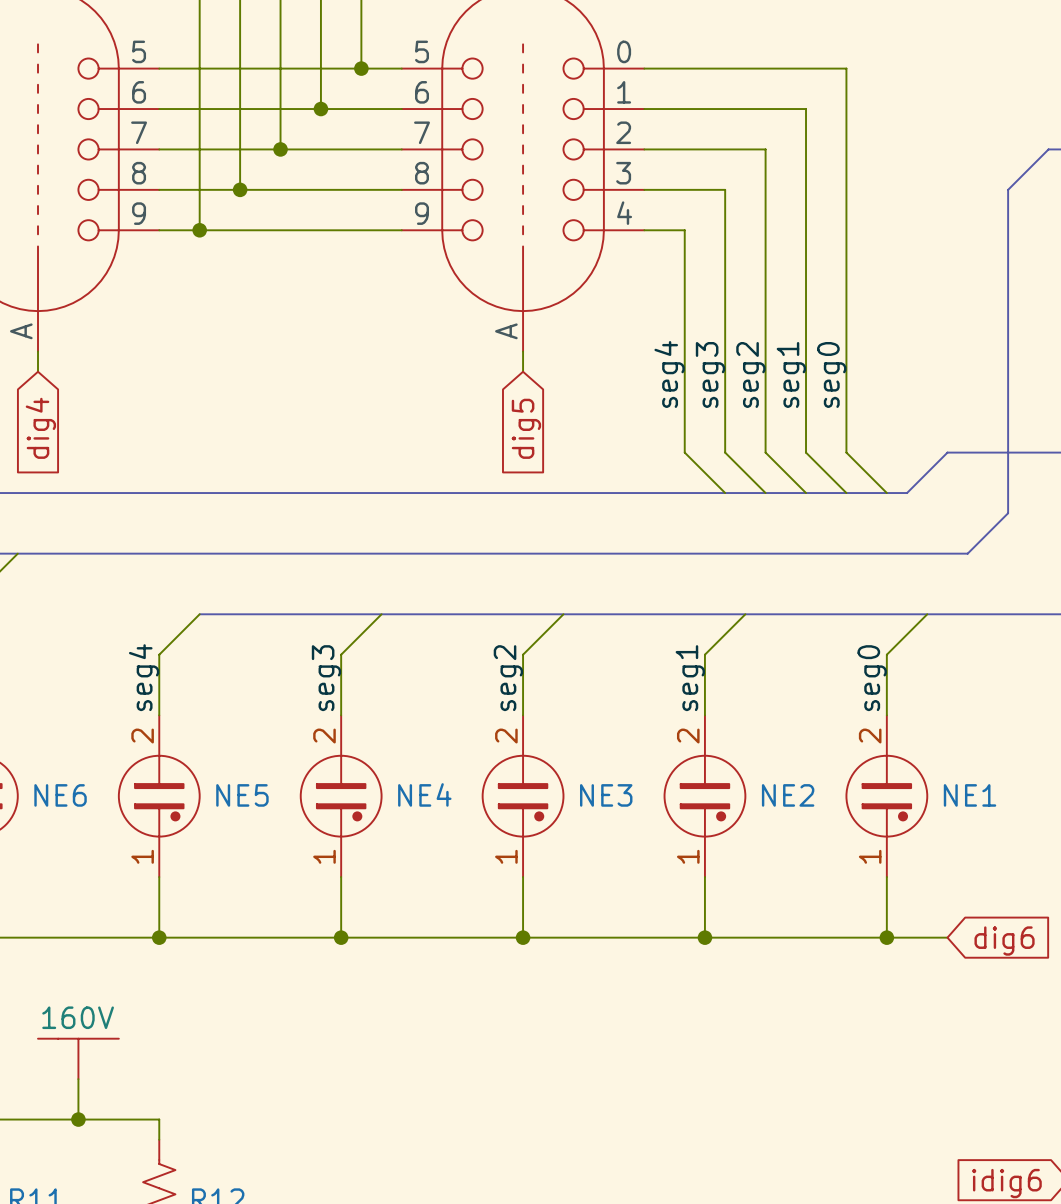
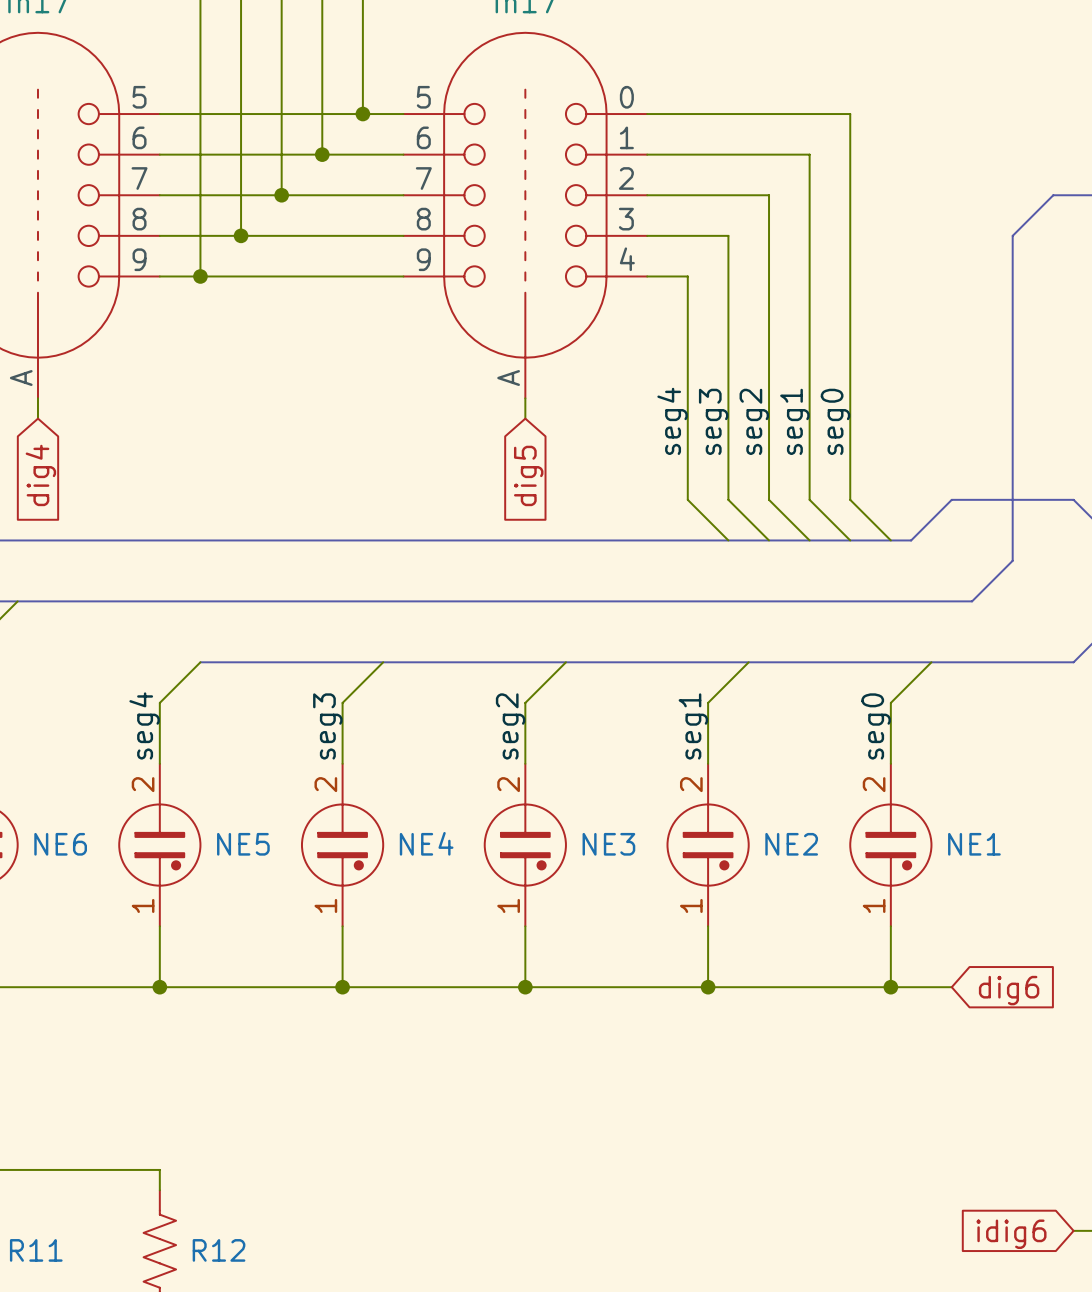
part: 160V (78, 1058) -> none
wire: (78, 1079) (78, 1119) -> none
junction: (78, 1119) -> none

